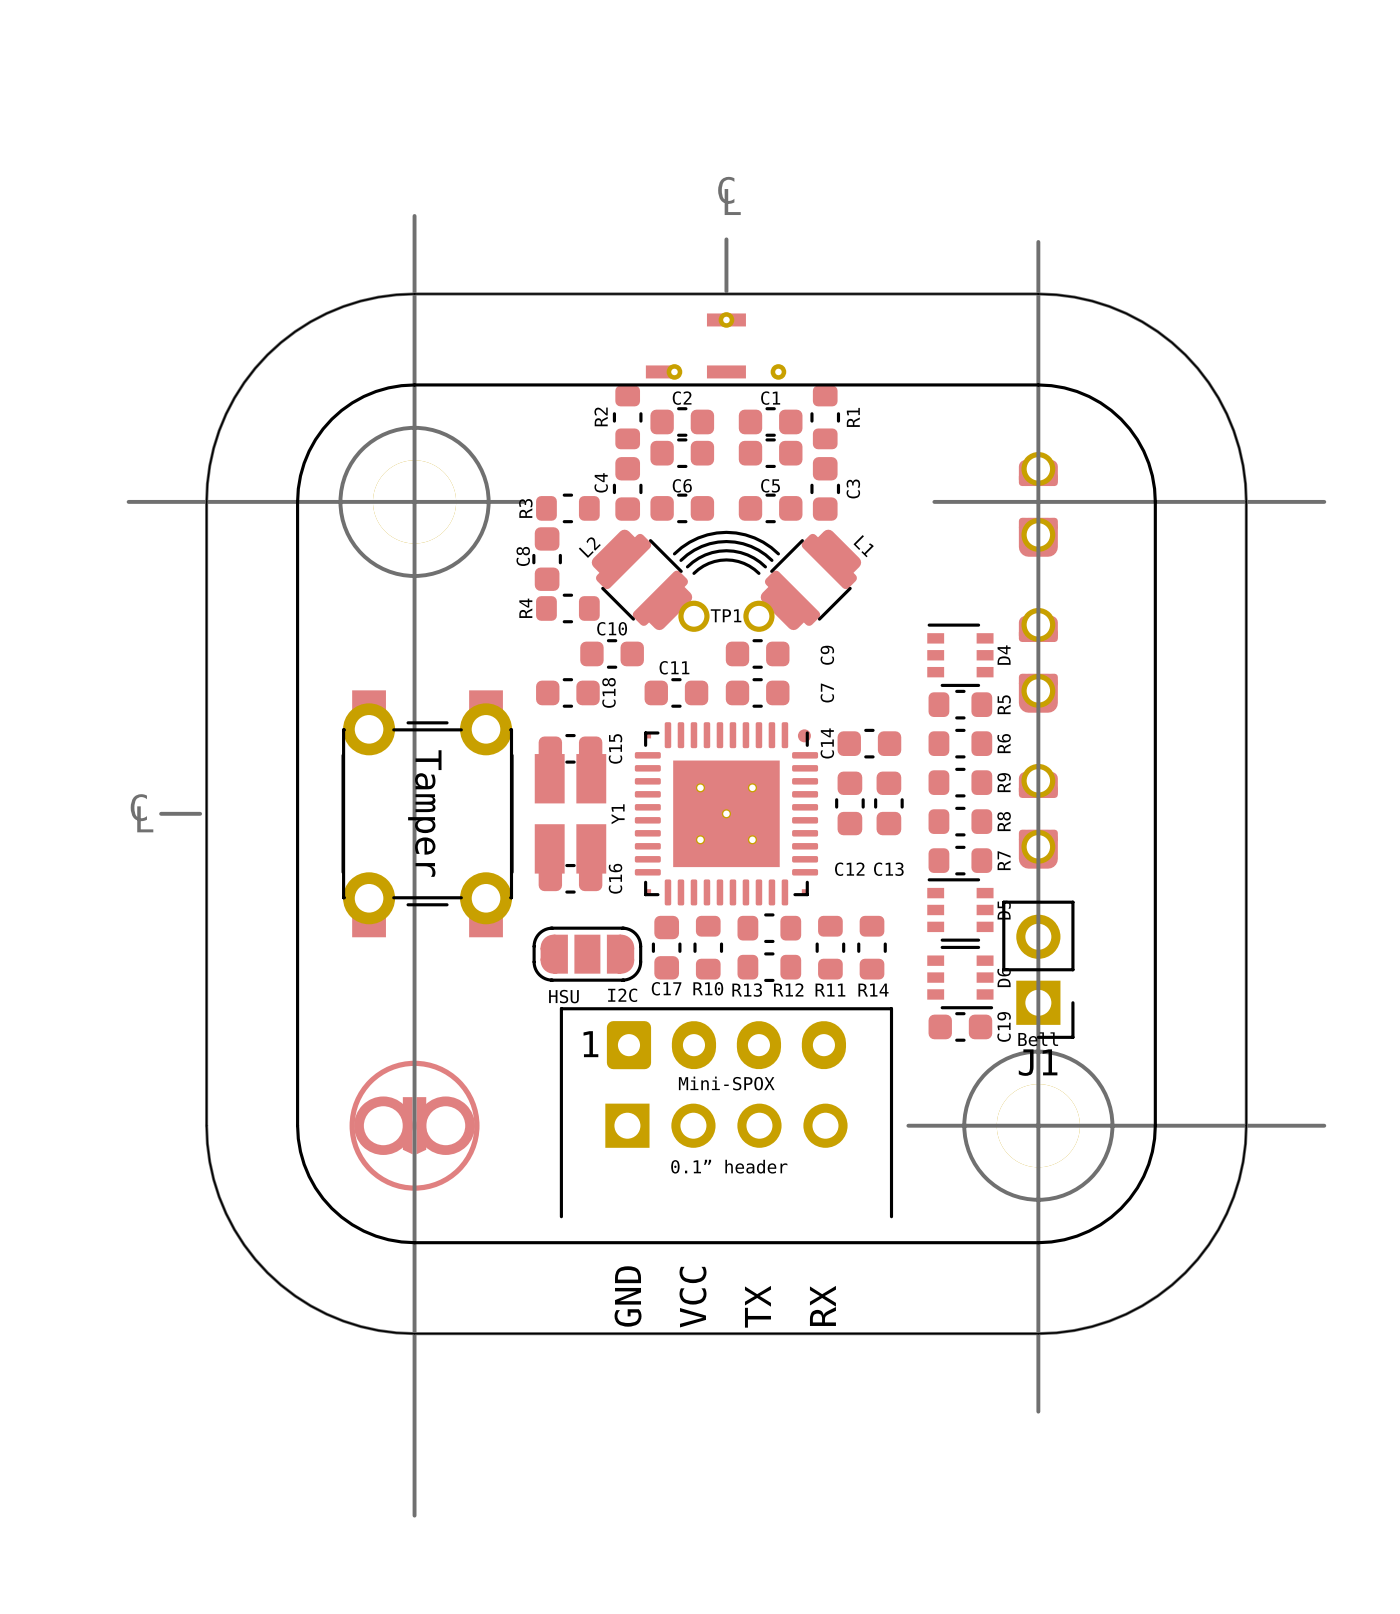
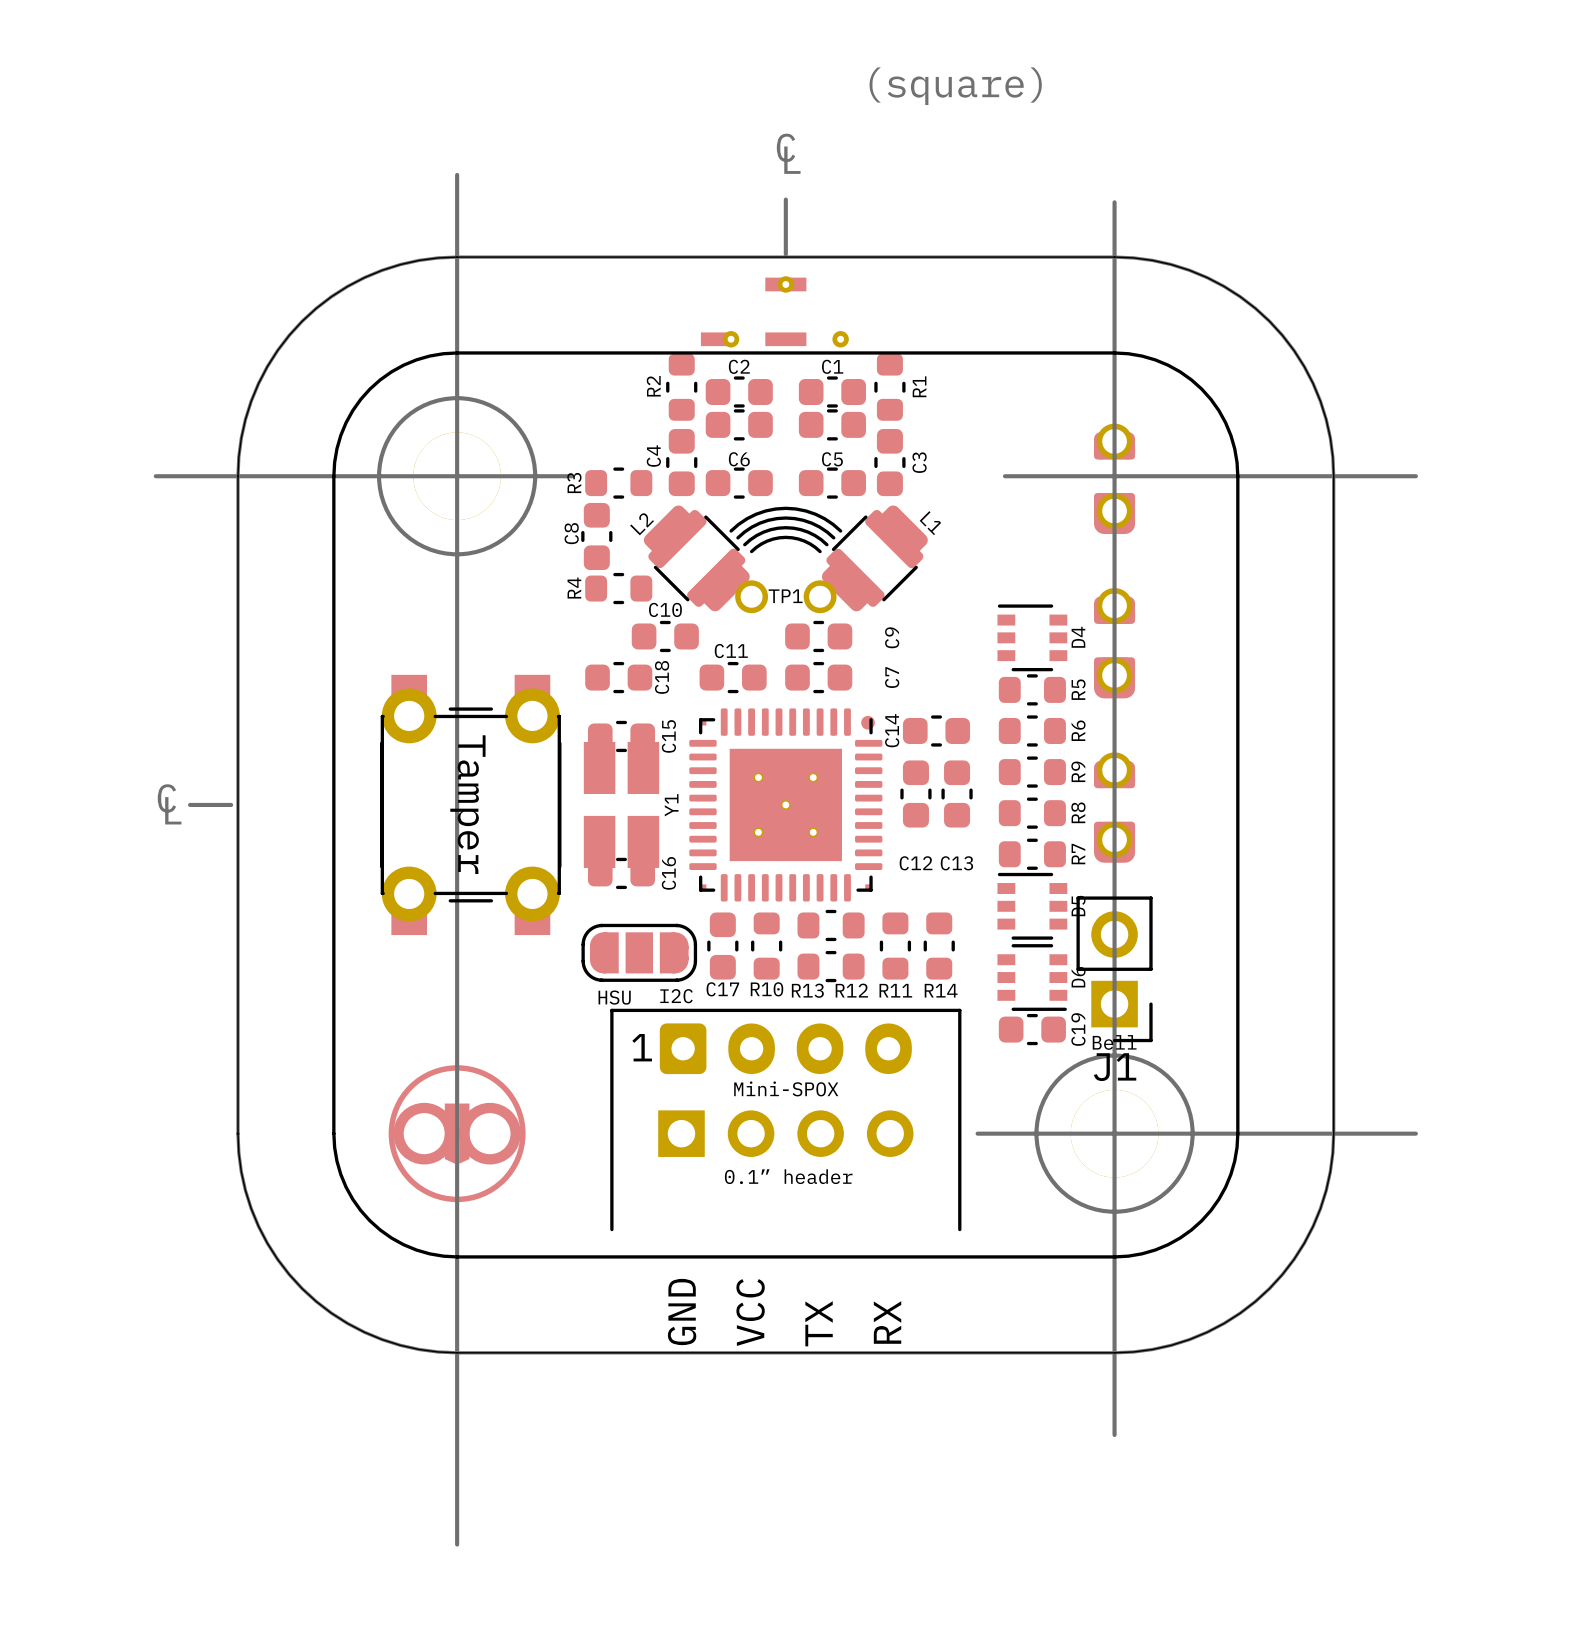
text: none -> (square) (955, 86)

